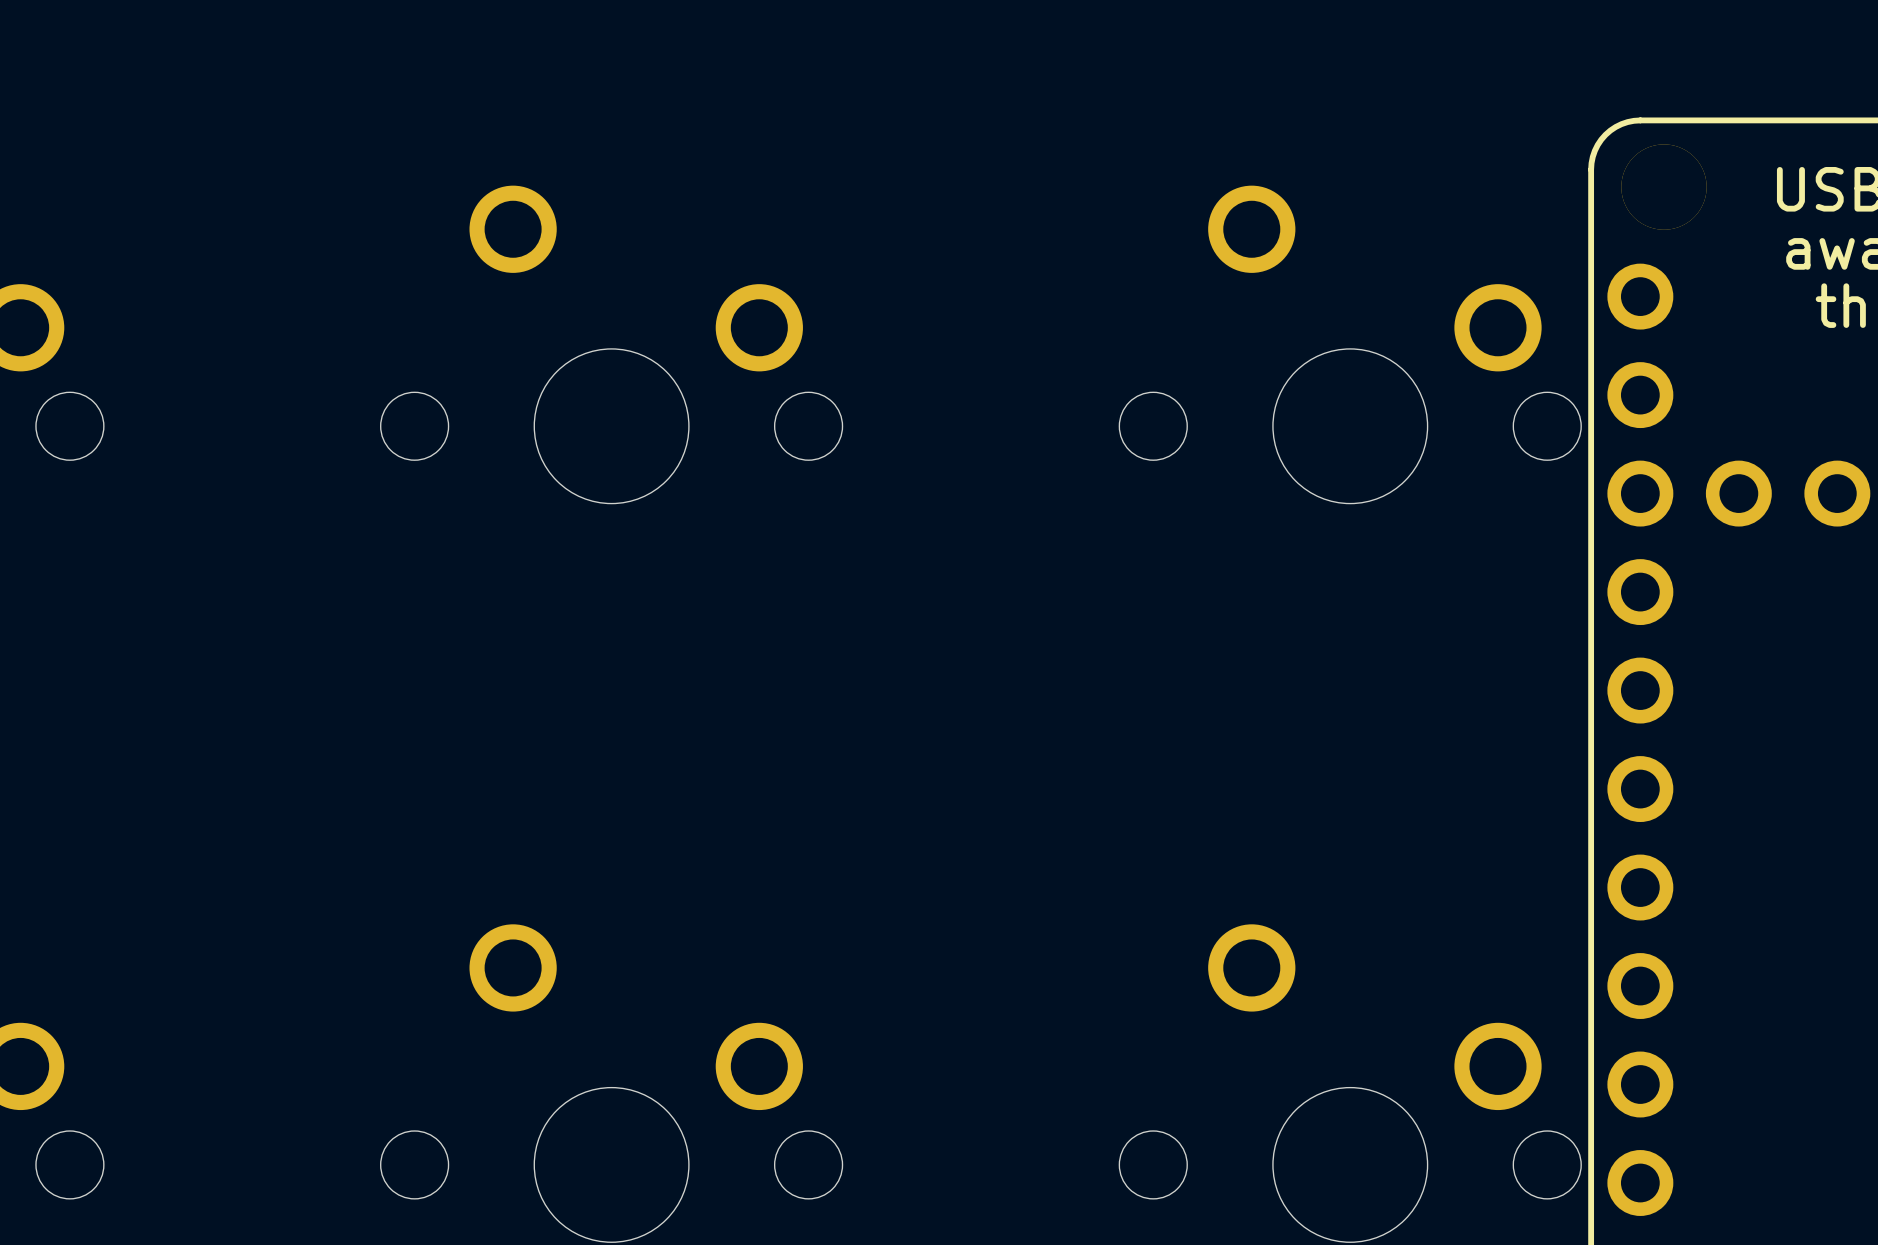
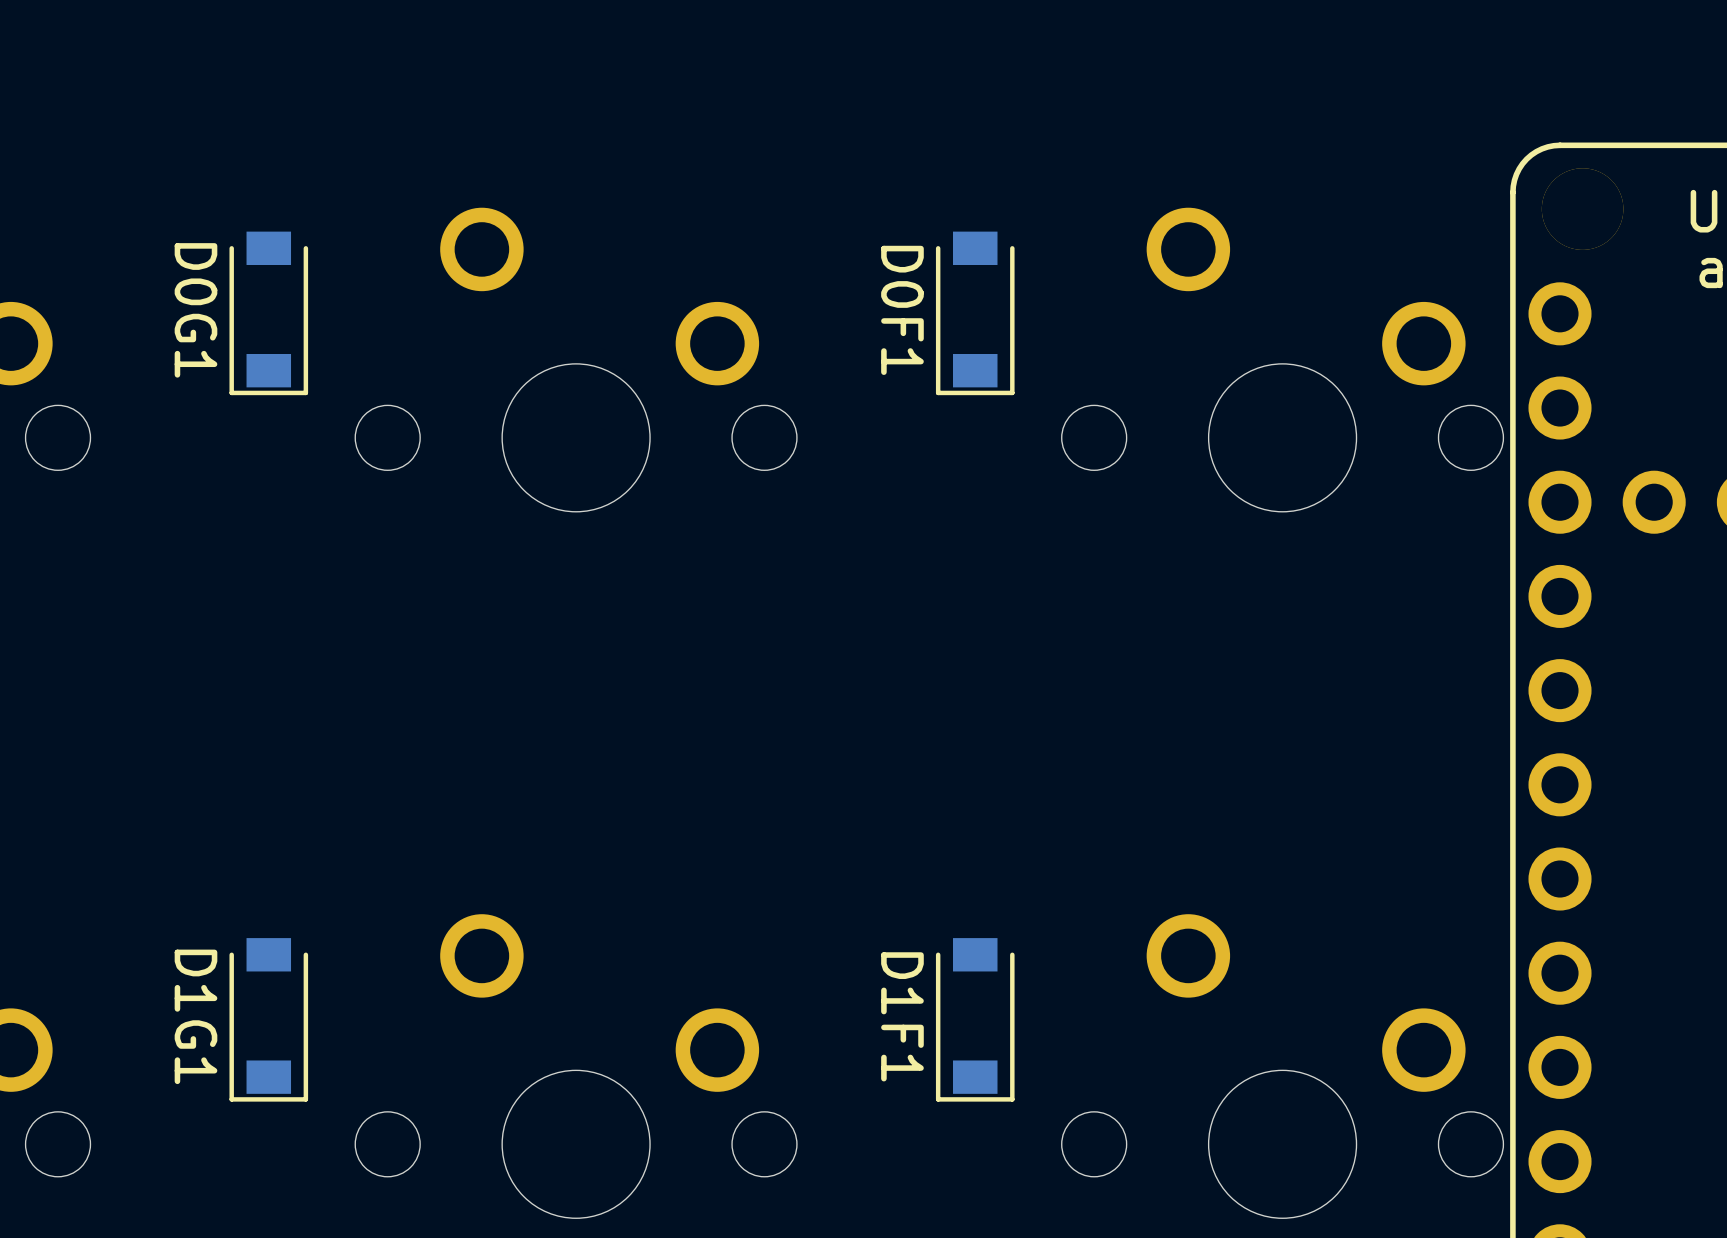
D0G1: none -> (268, 313)
D0F1: none -> (975, 313)
D1G1: none -> (268, 1019)
D1F1: none -> (975, 1019)

